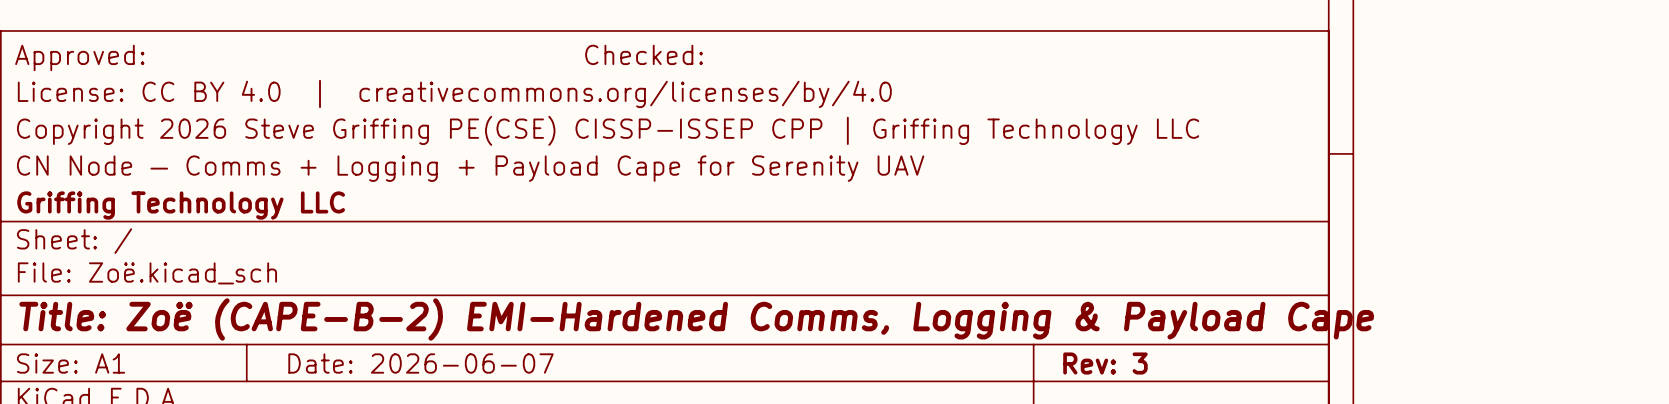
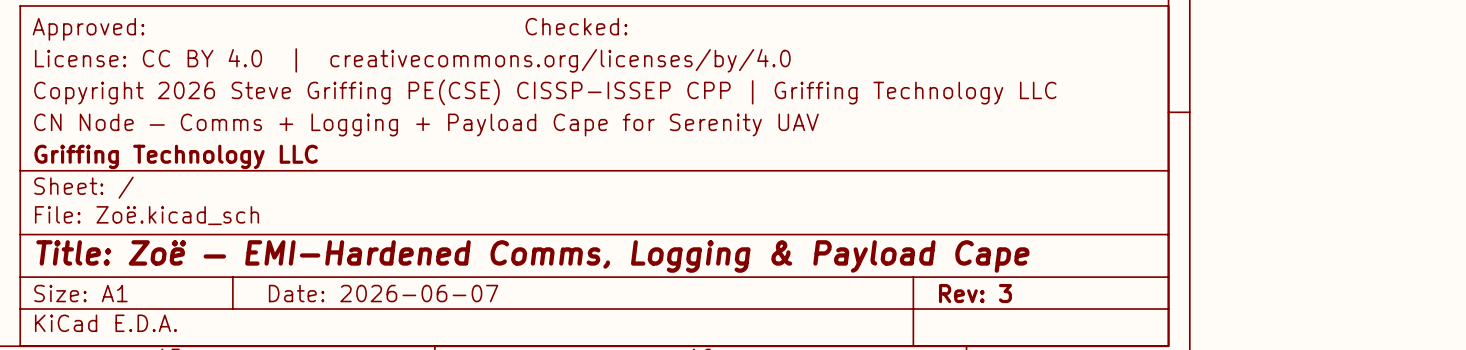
title block: Title: Zoë (CAPE-B-2) EMI-Hardened Comms, Logging & Payload Cape (696, 319) -> Title: Zoë — EMI-Hardened Comms, Logging & Payload Cape (532, 256)

